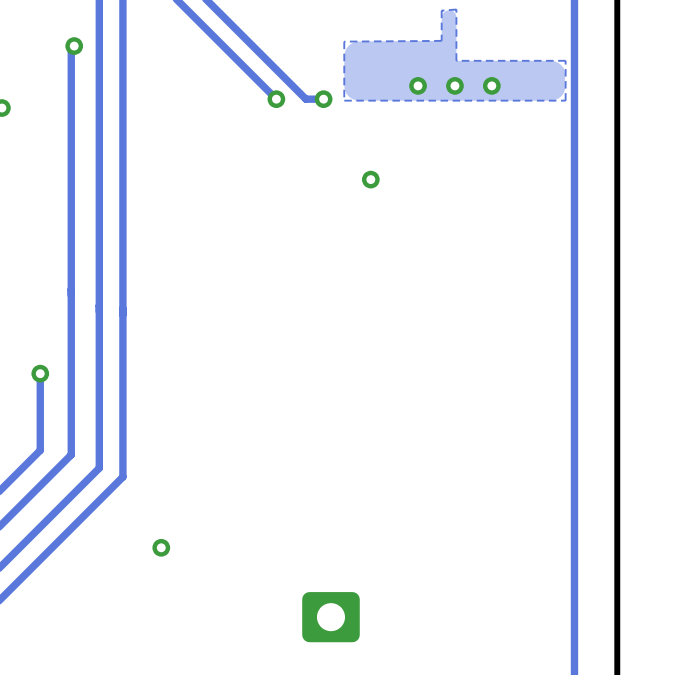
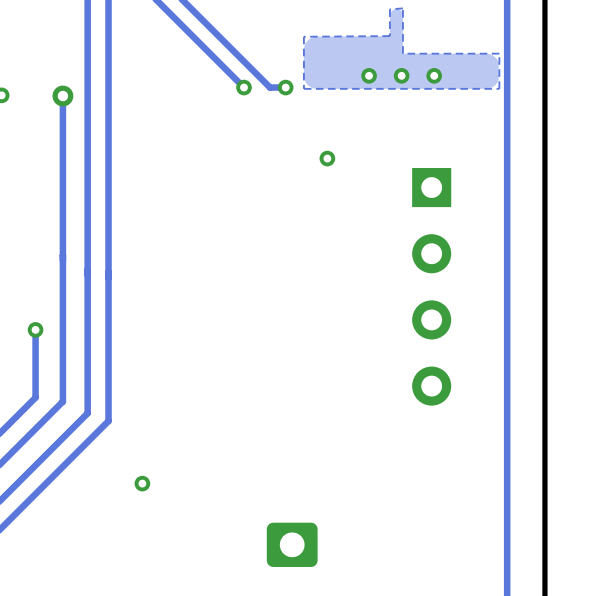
track: (74, 46) (71, 49) (71, 108) -> none
via: (74, 46) -> none
via: none -> (62, 96)
part: none -> (431, 286)

